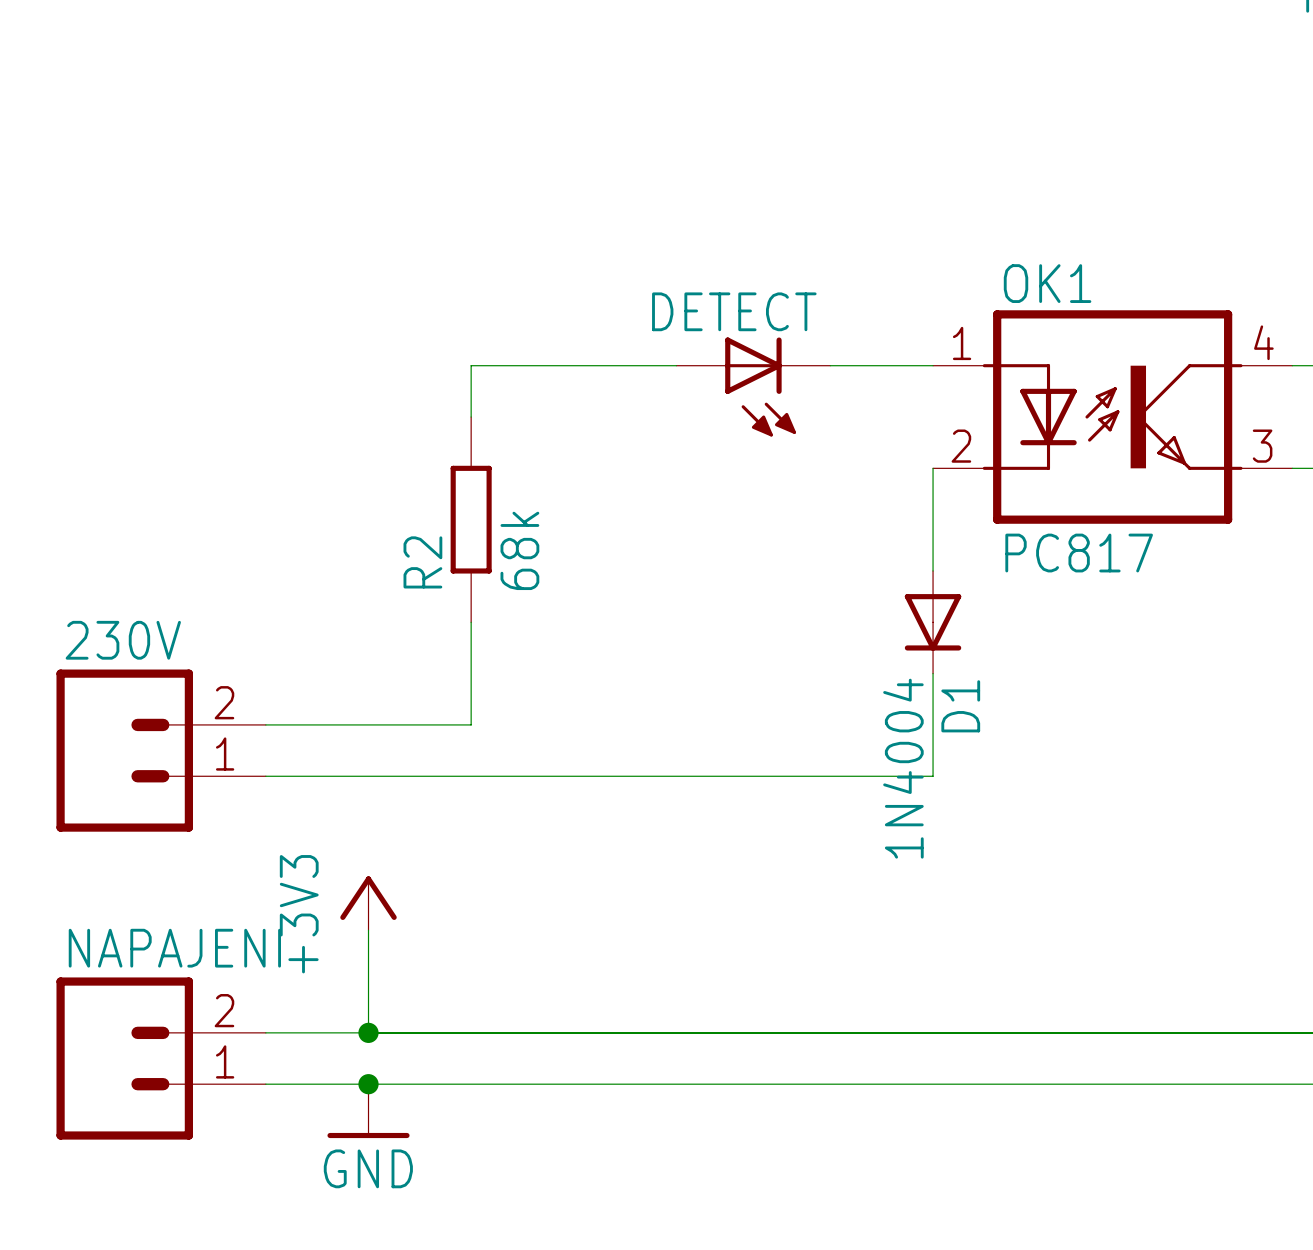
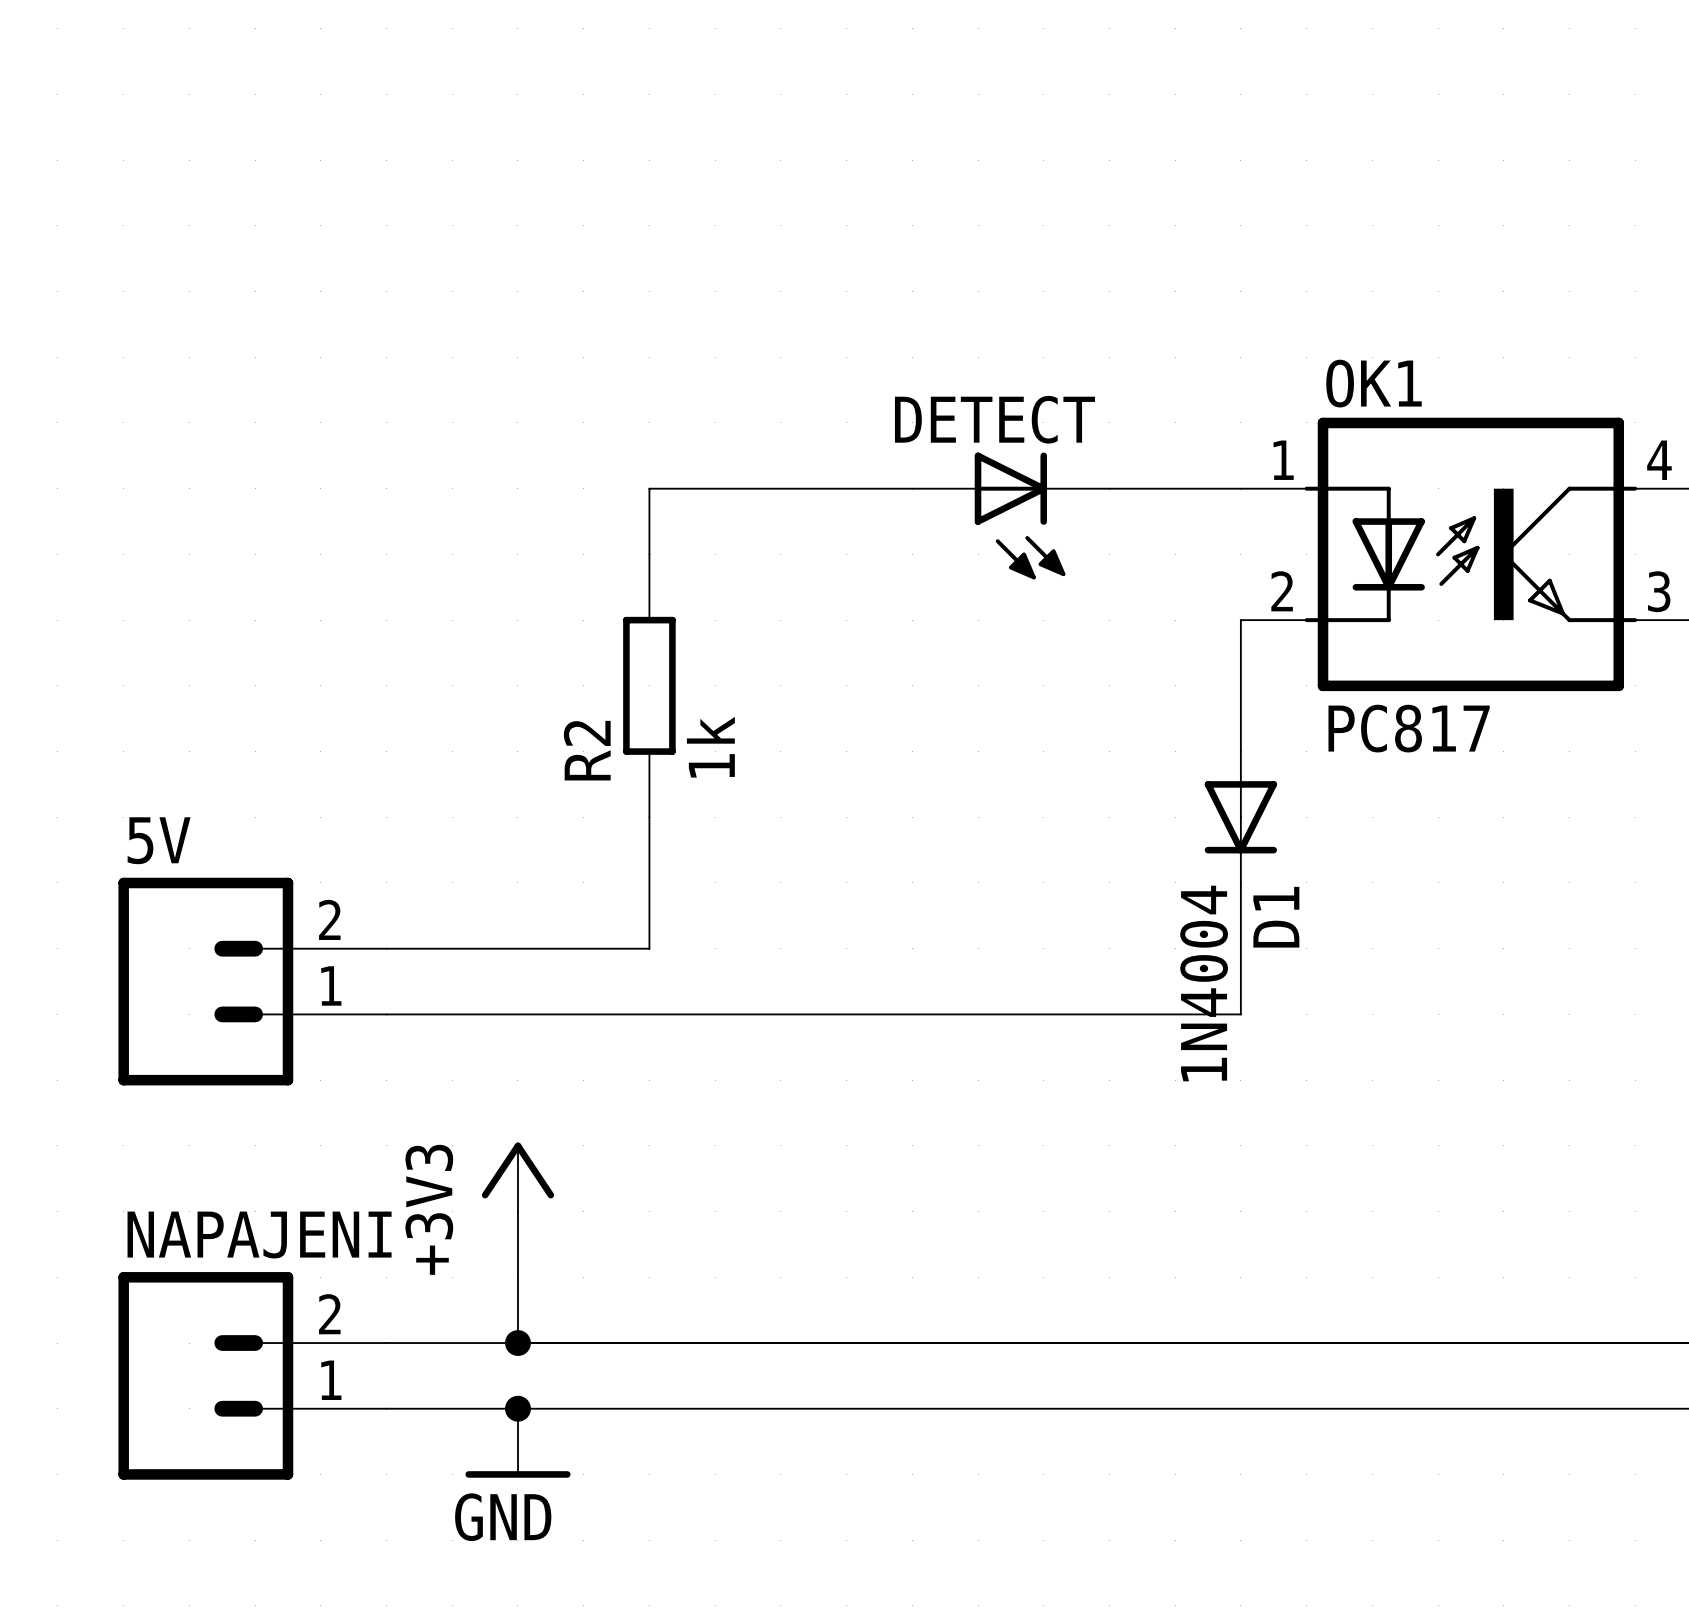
R2 value: 68k (519, 550) -> 1k (710, 747)
230V name: 230V (123, 640) -> 5V (159, 840)

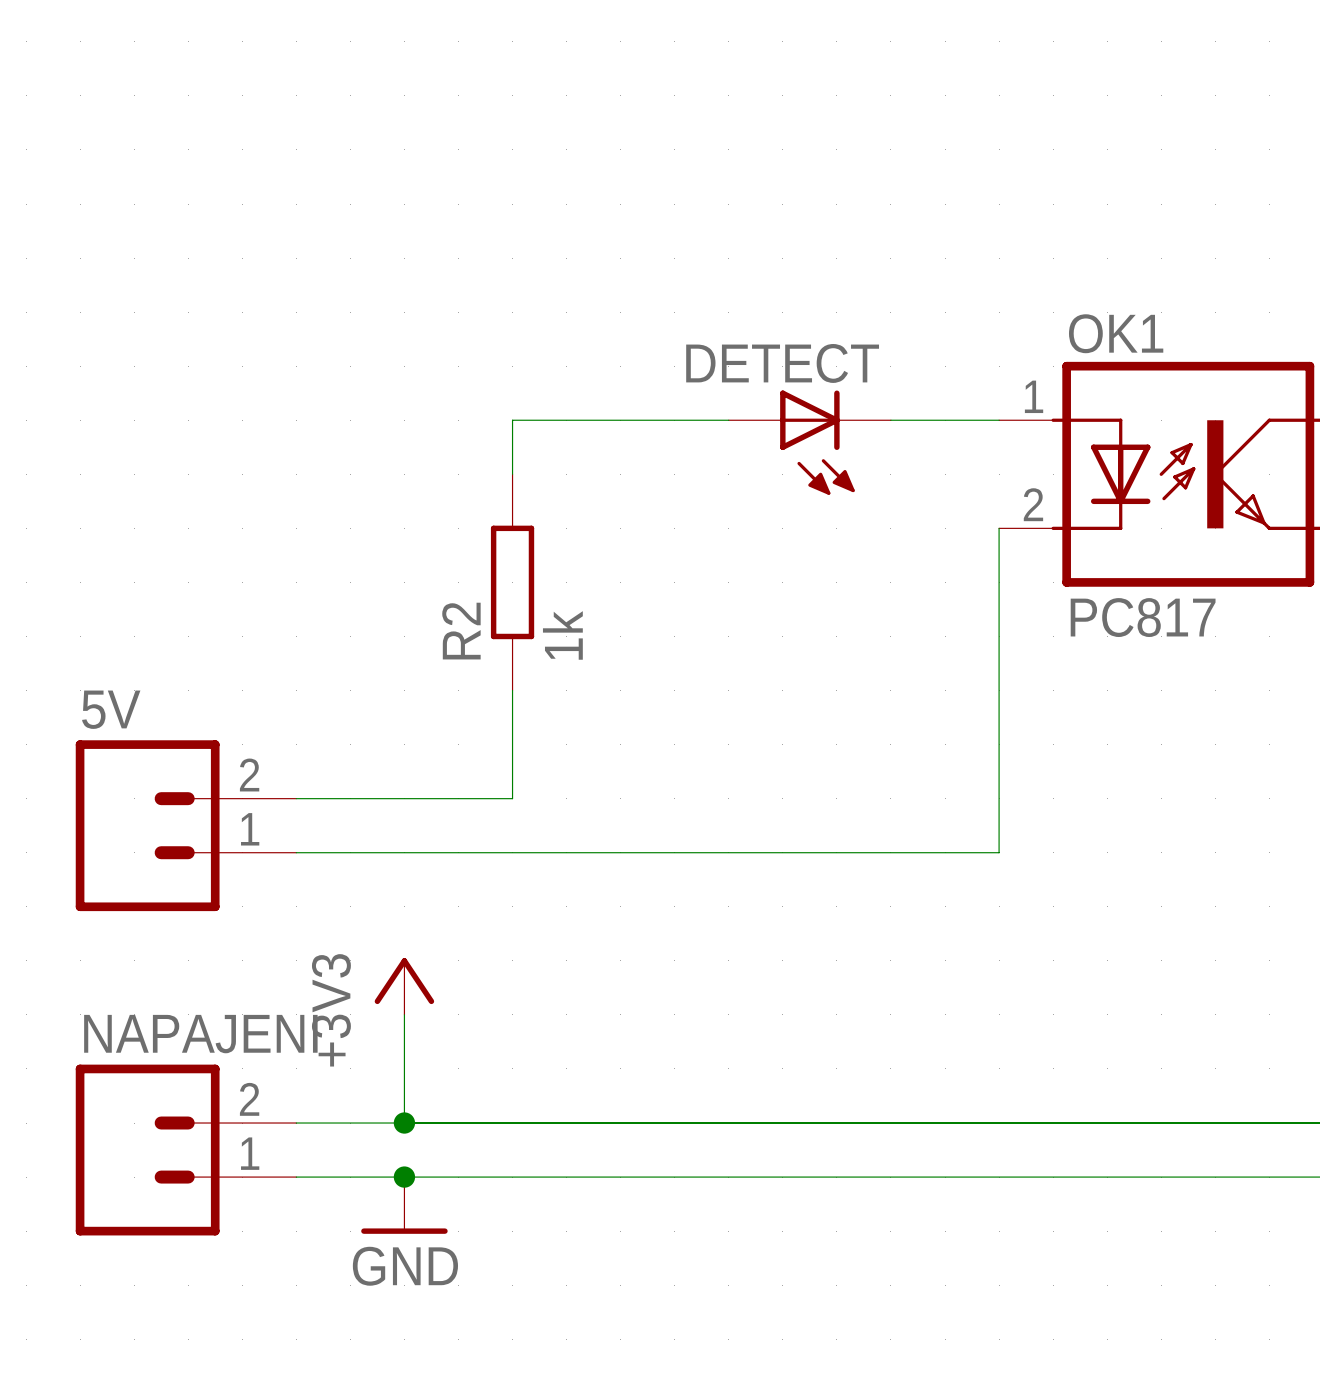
D1: 1N4004 (1240, 817) -> none

